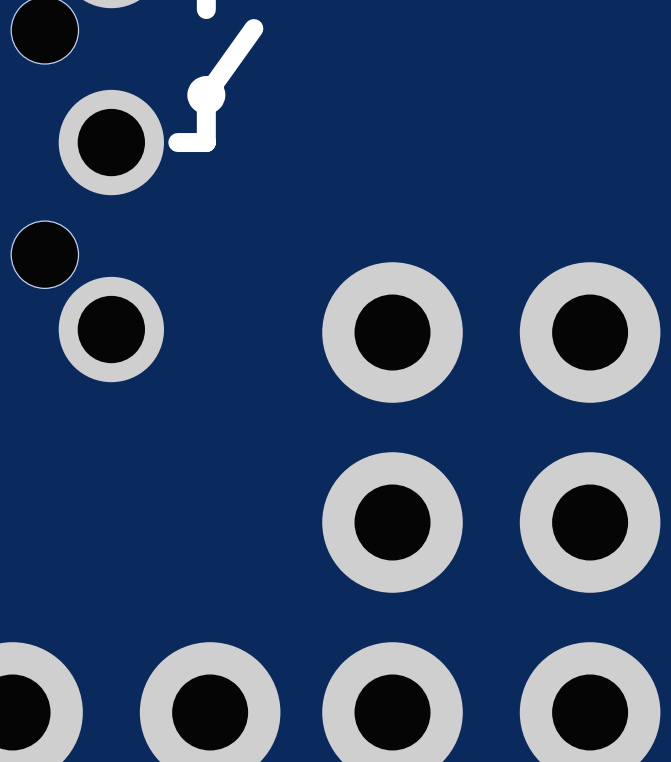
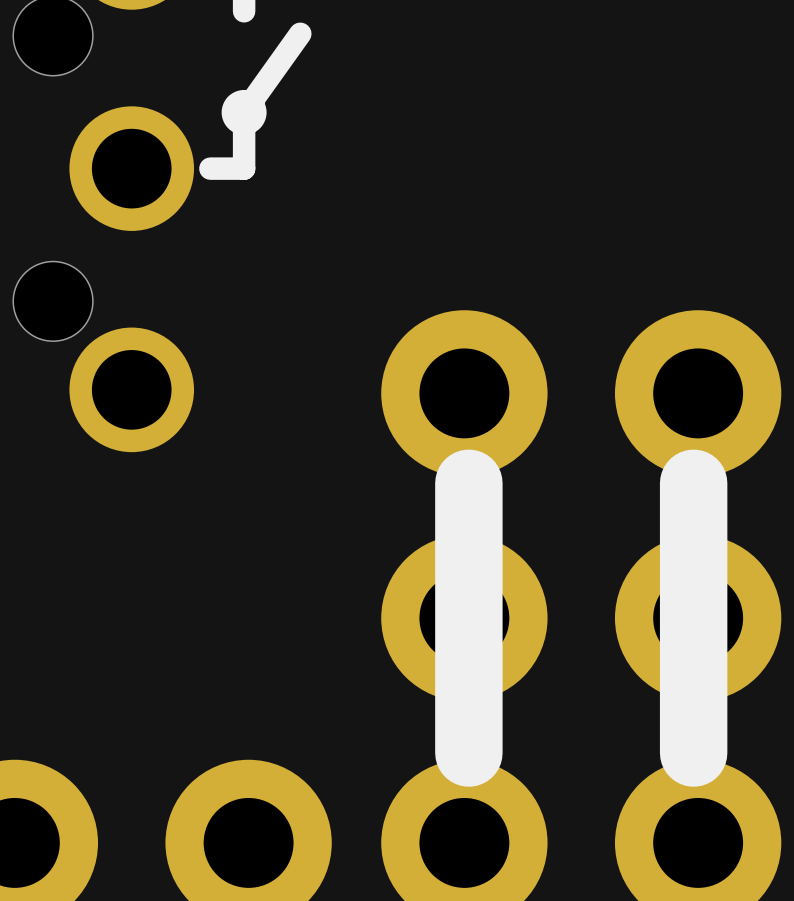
line: none -> (468, 483) (468, 753)
line: none -> (693, 483) (693, 753)

